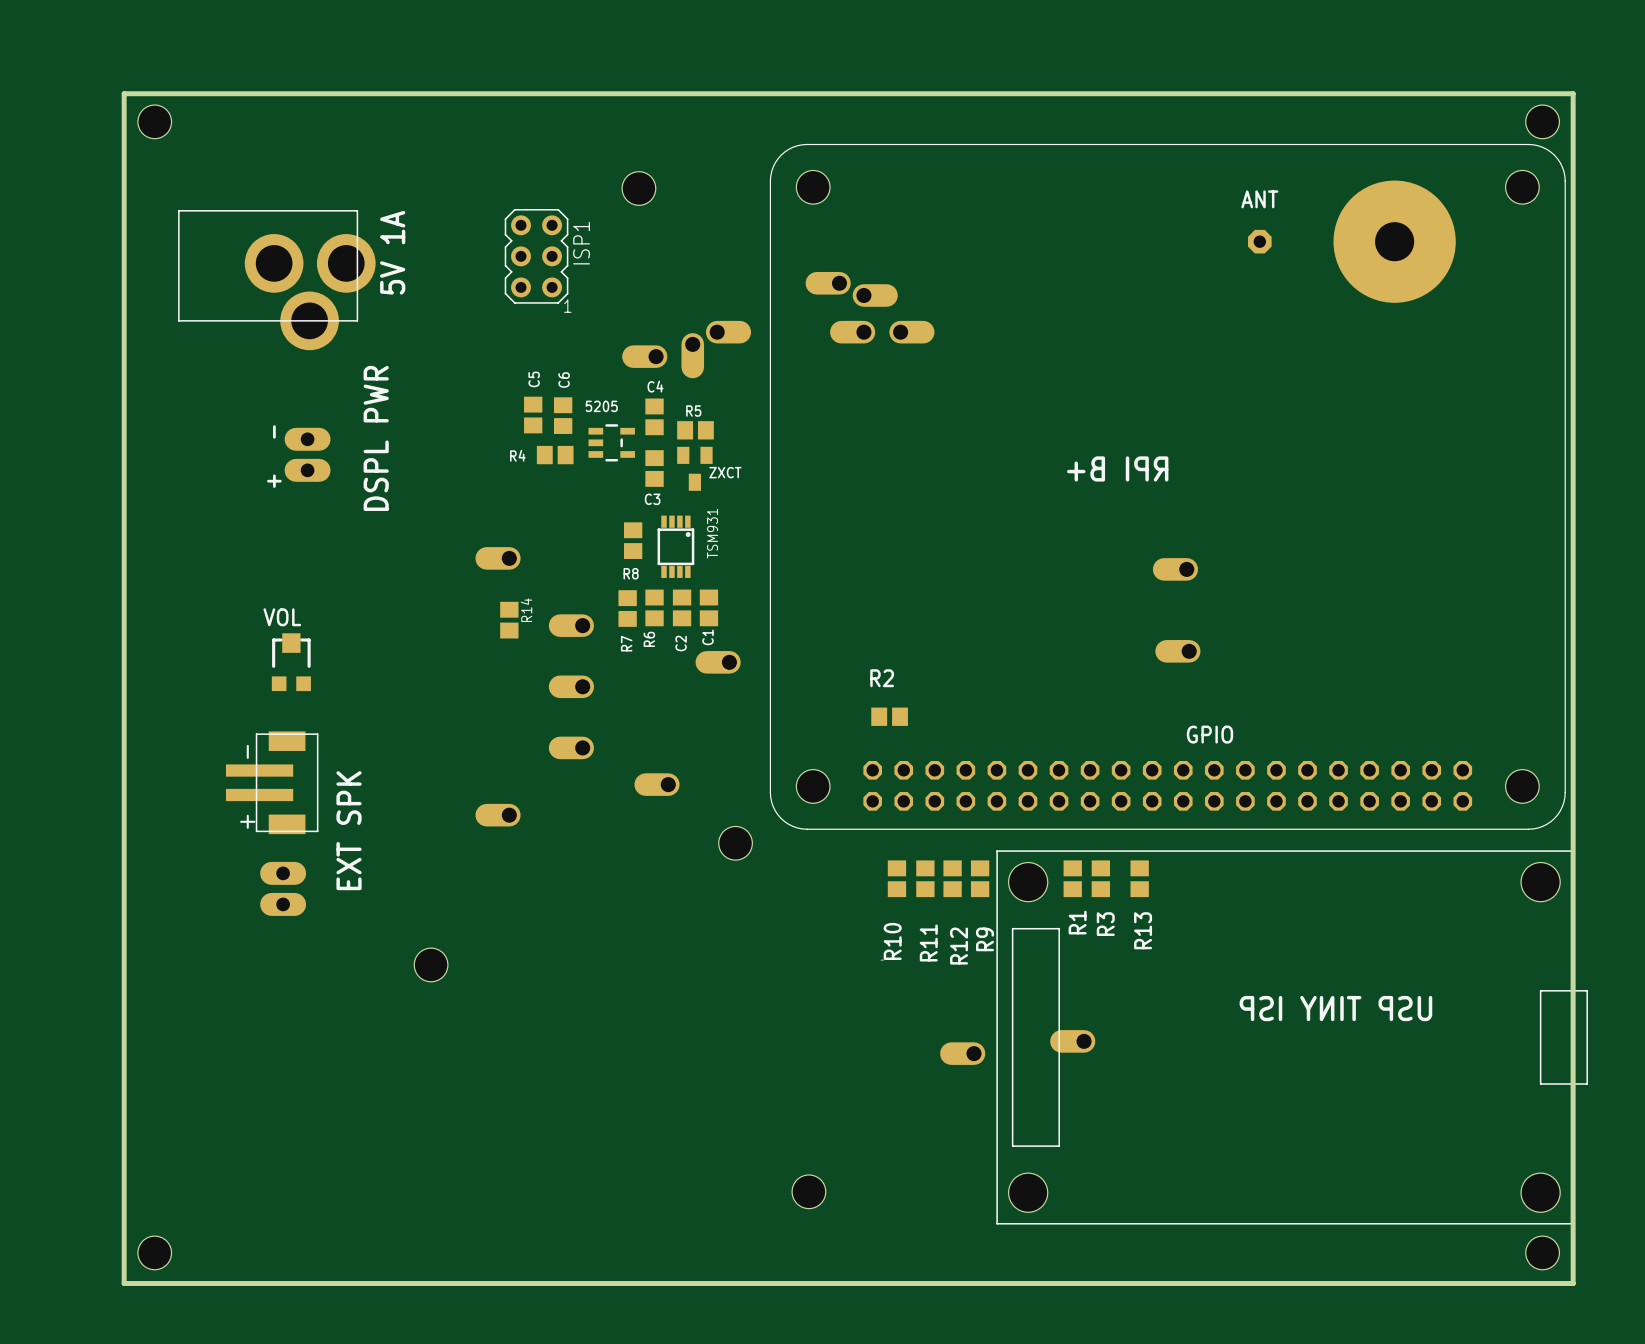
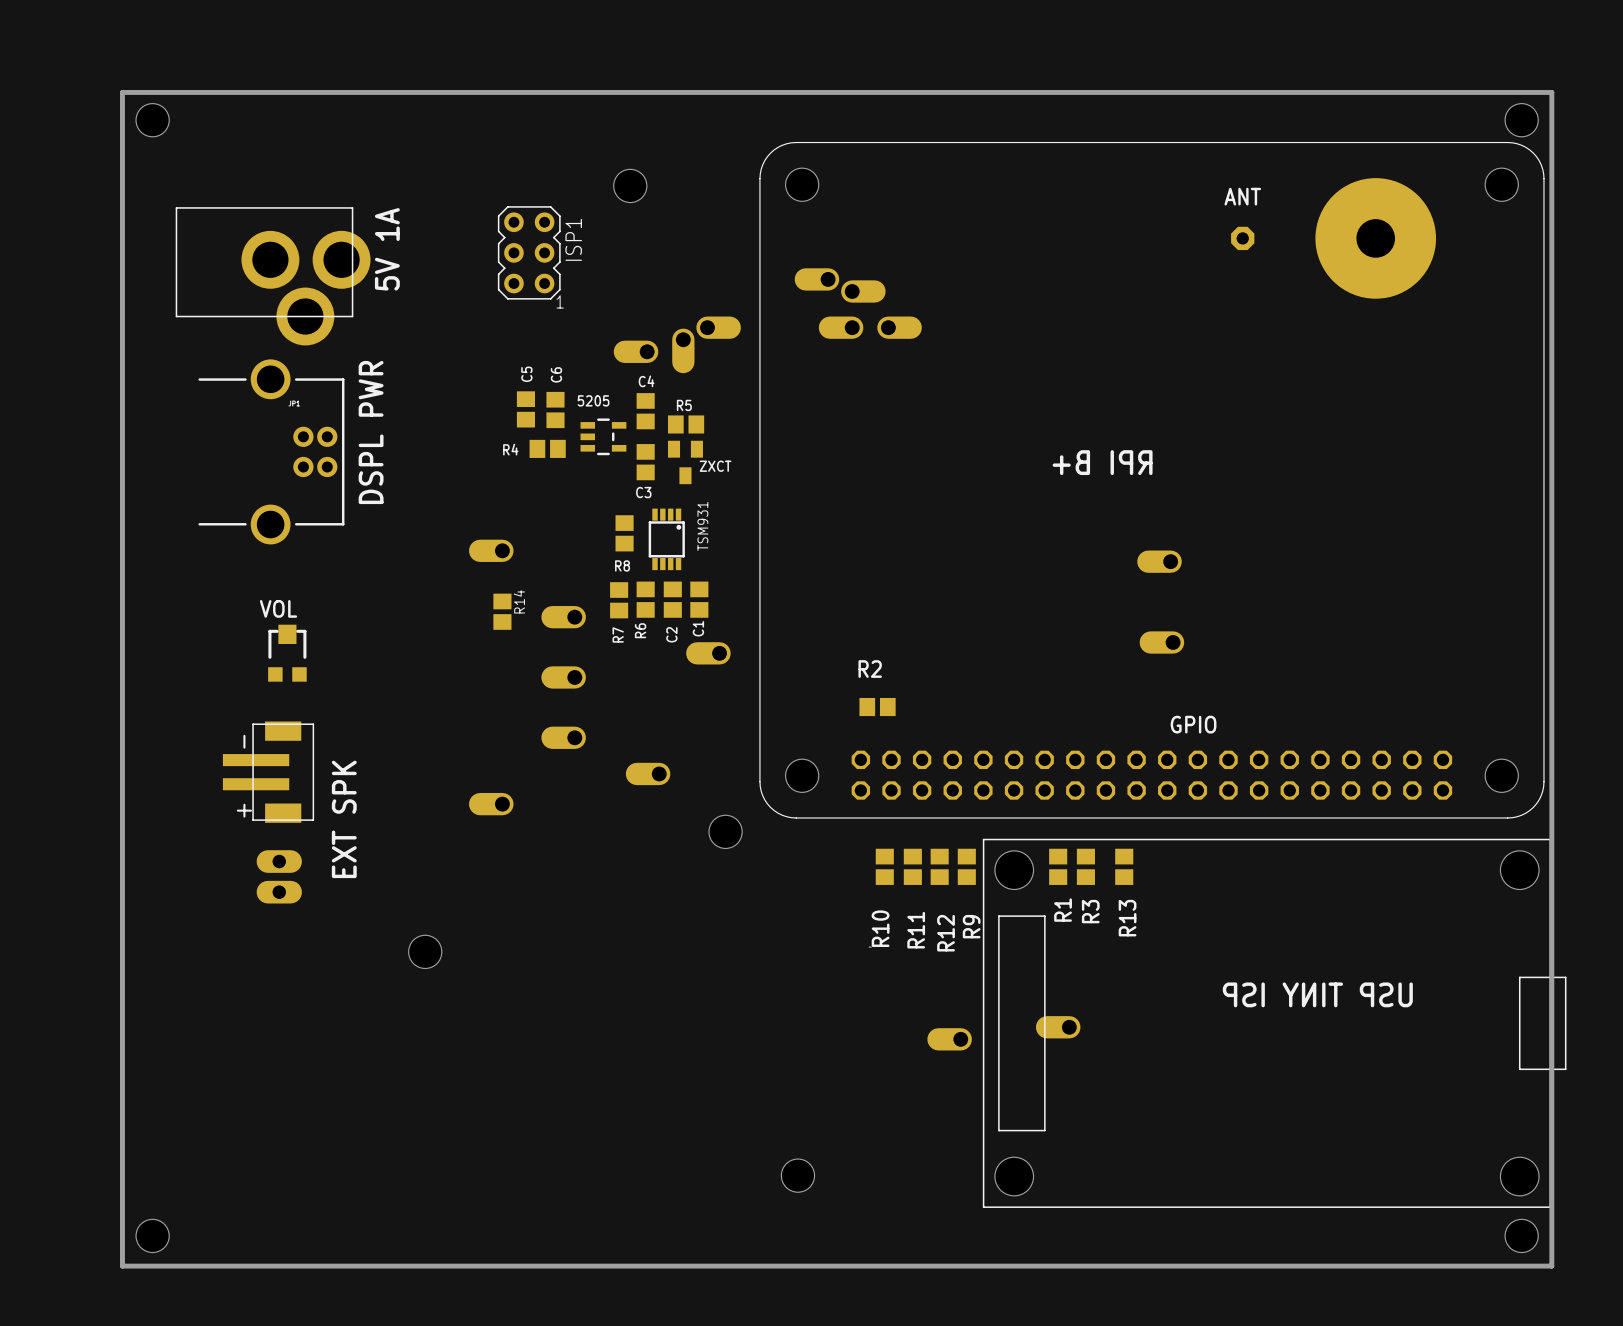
part: (307, 454) -> none
text: + - (274, 456) -> none
part: none -> (271, 451)

